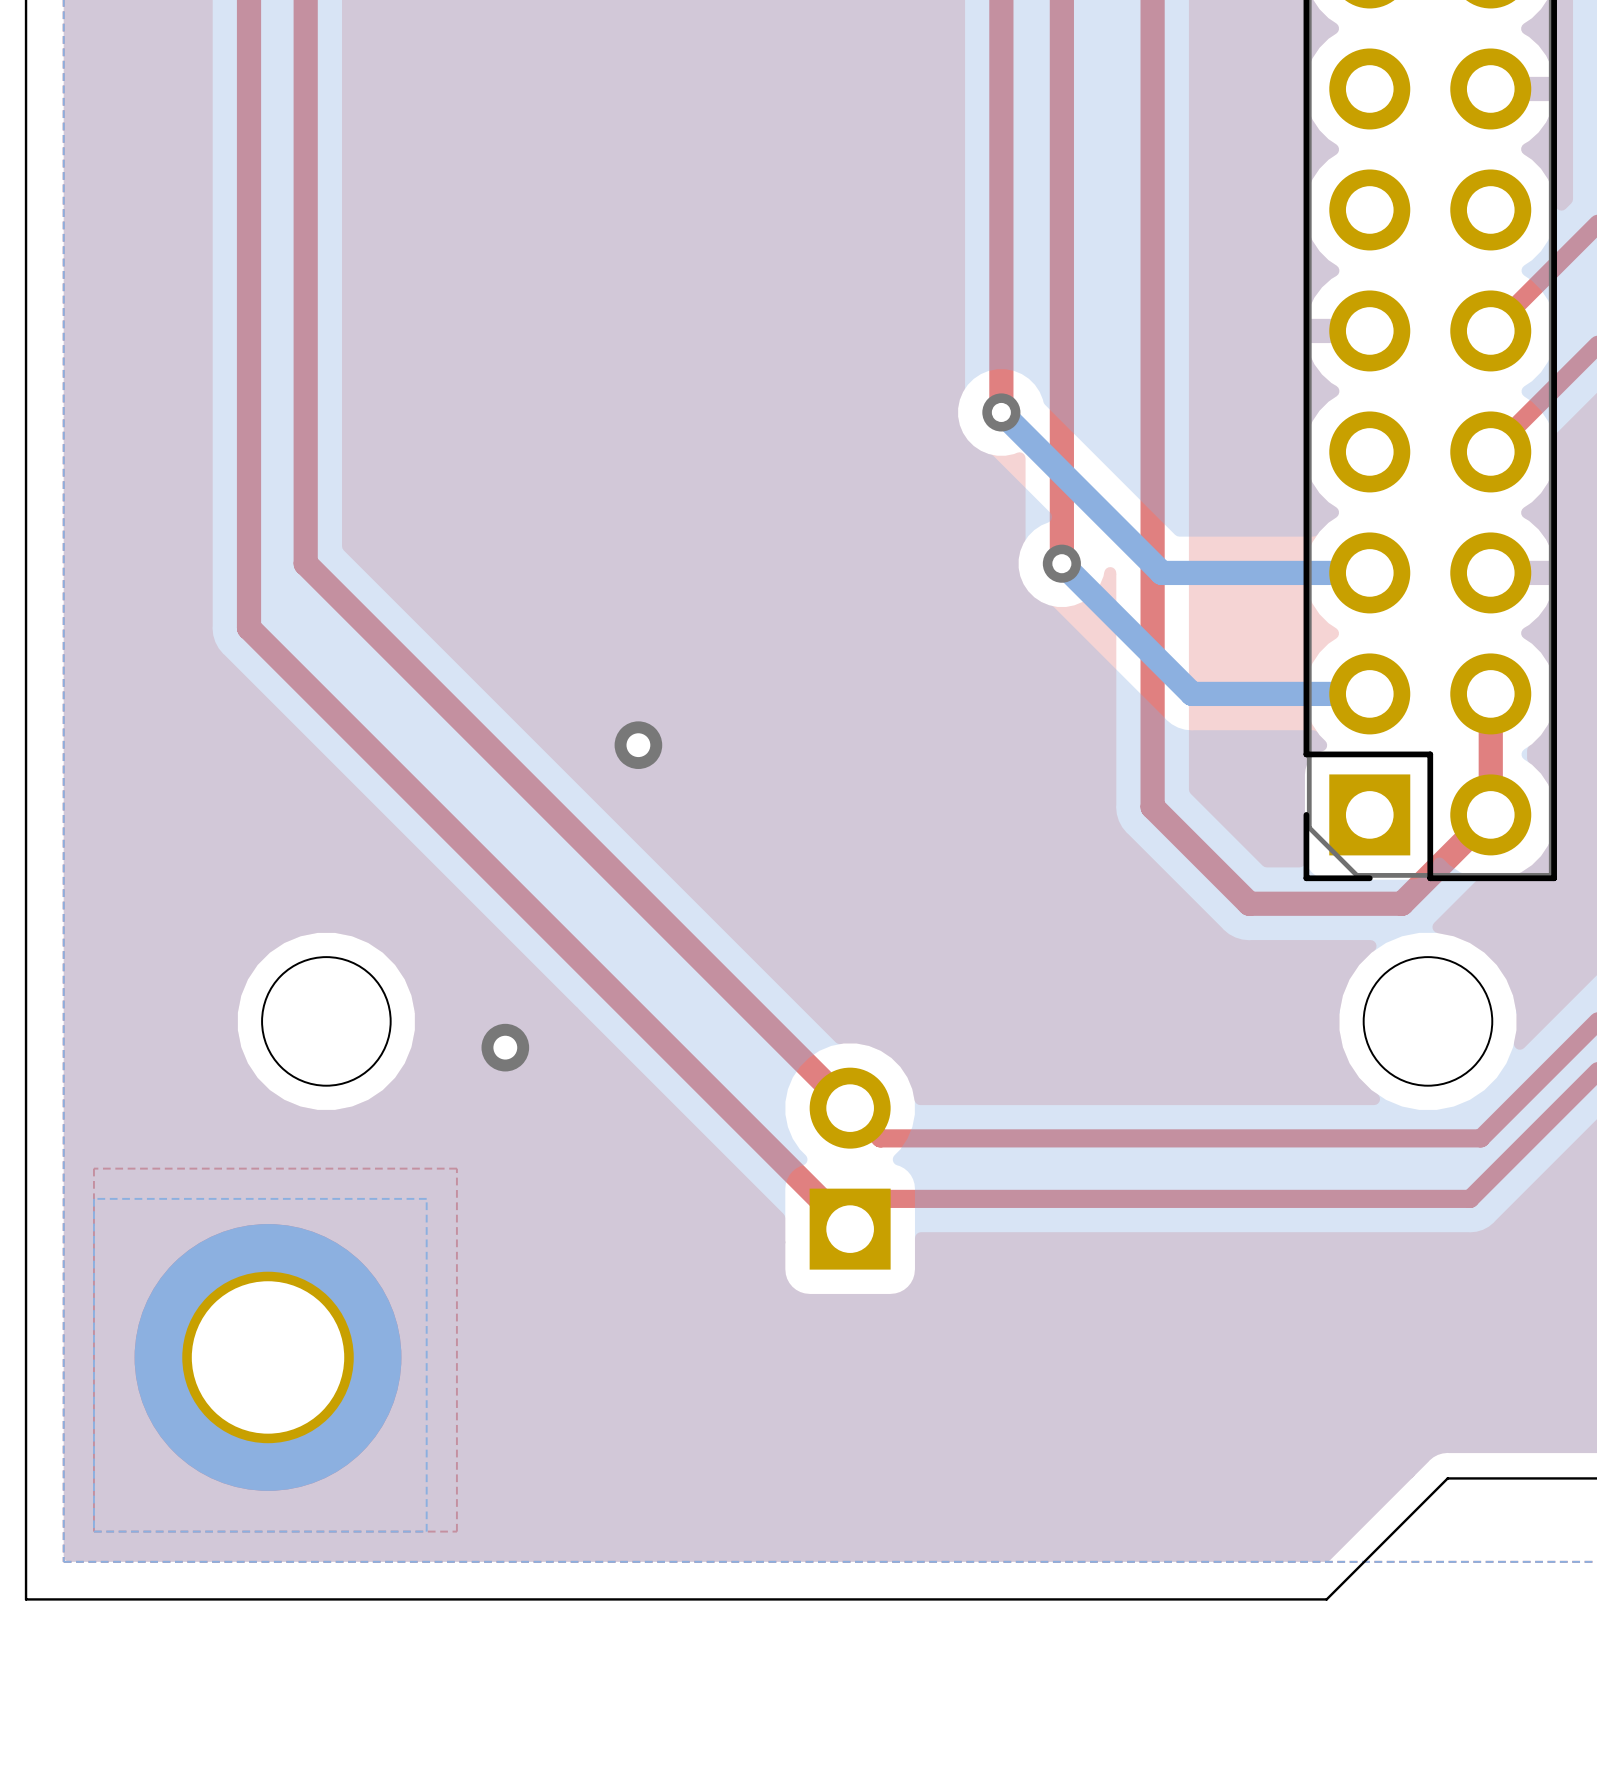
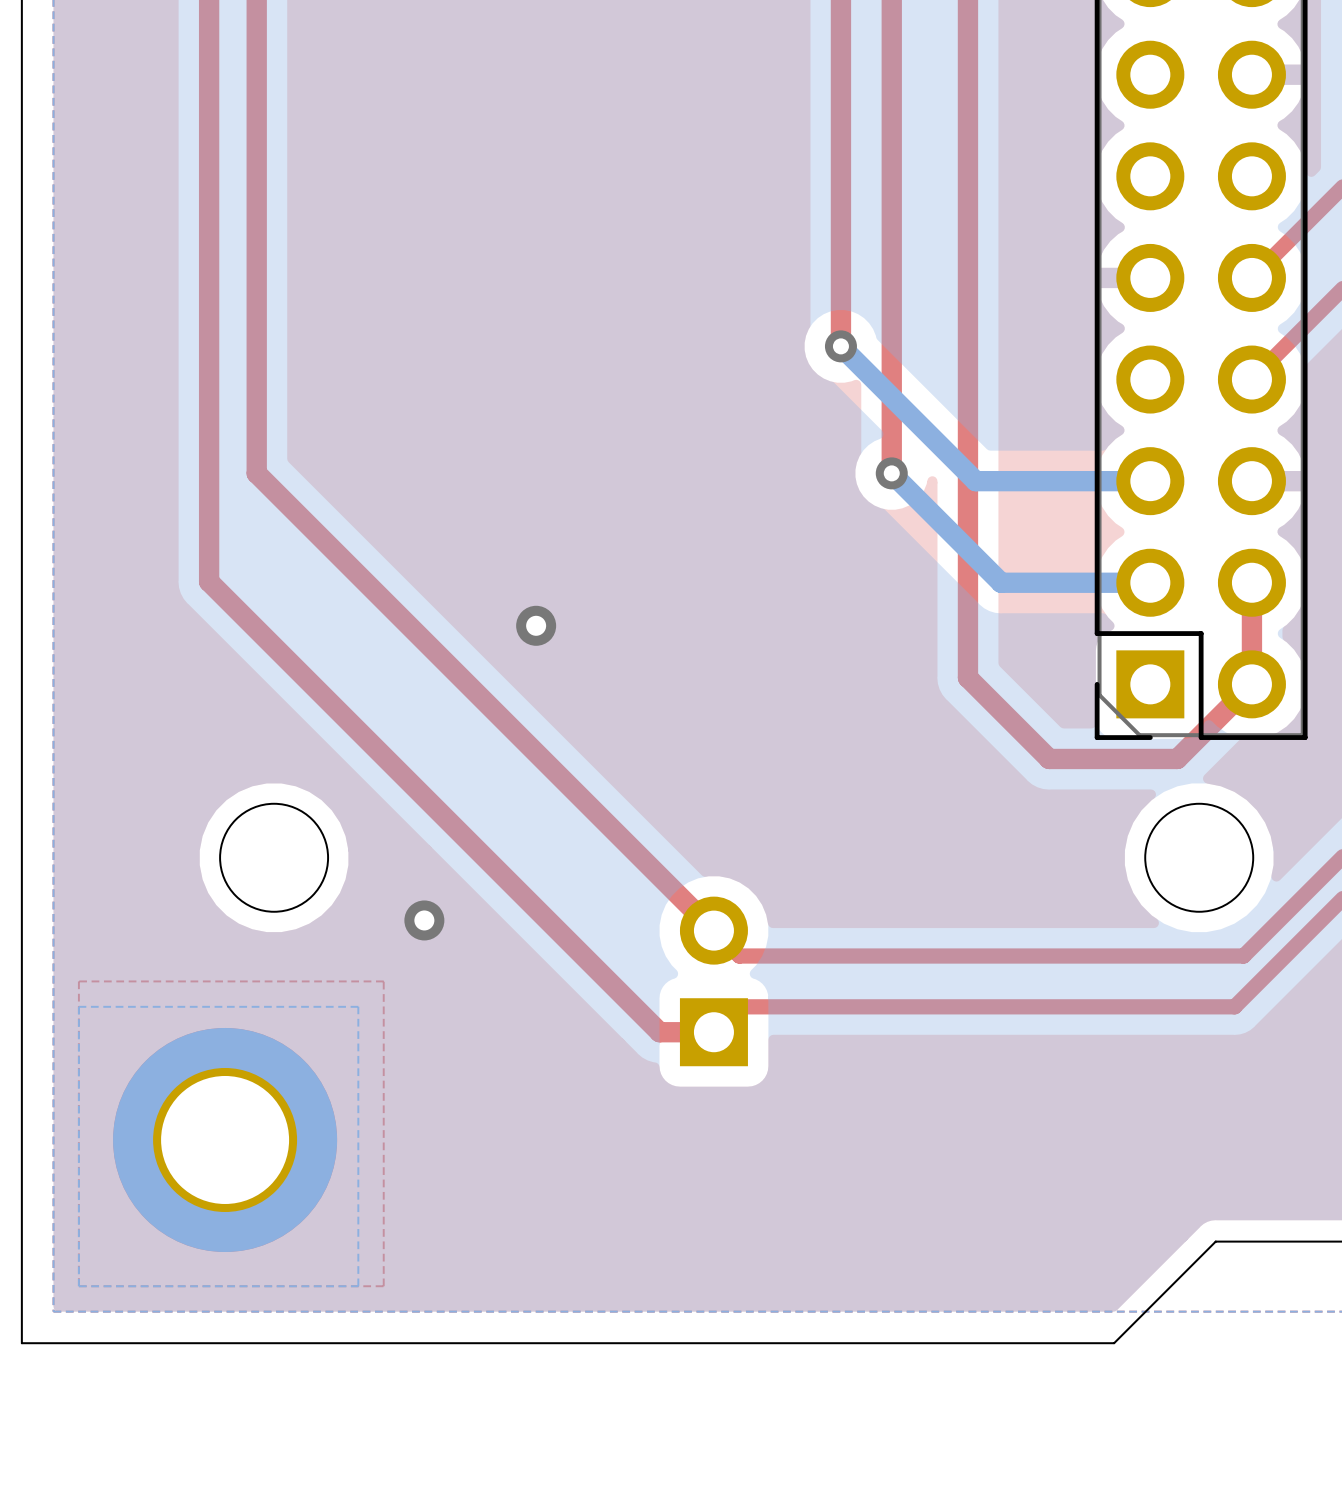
top track: (249, 628) (850, 1229) -> (209, 527) (209, 581) (659, 1032) (713, 1032)
via position: (505, 1047) -> (424, 920)

